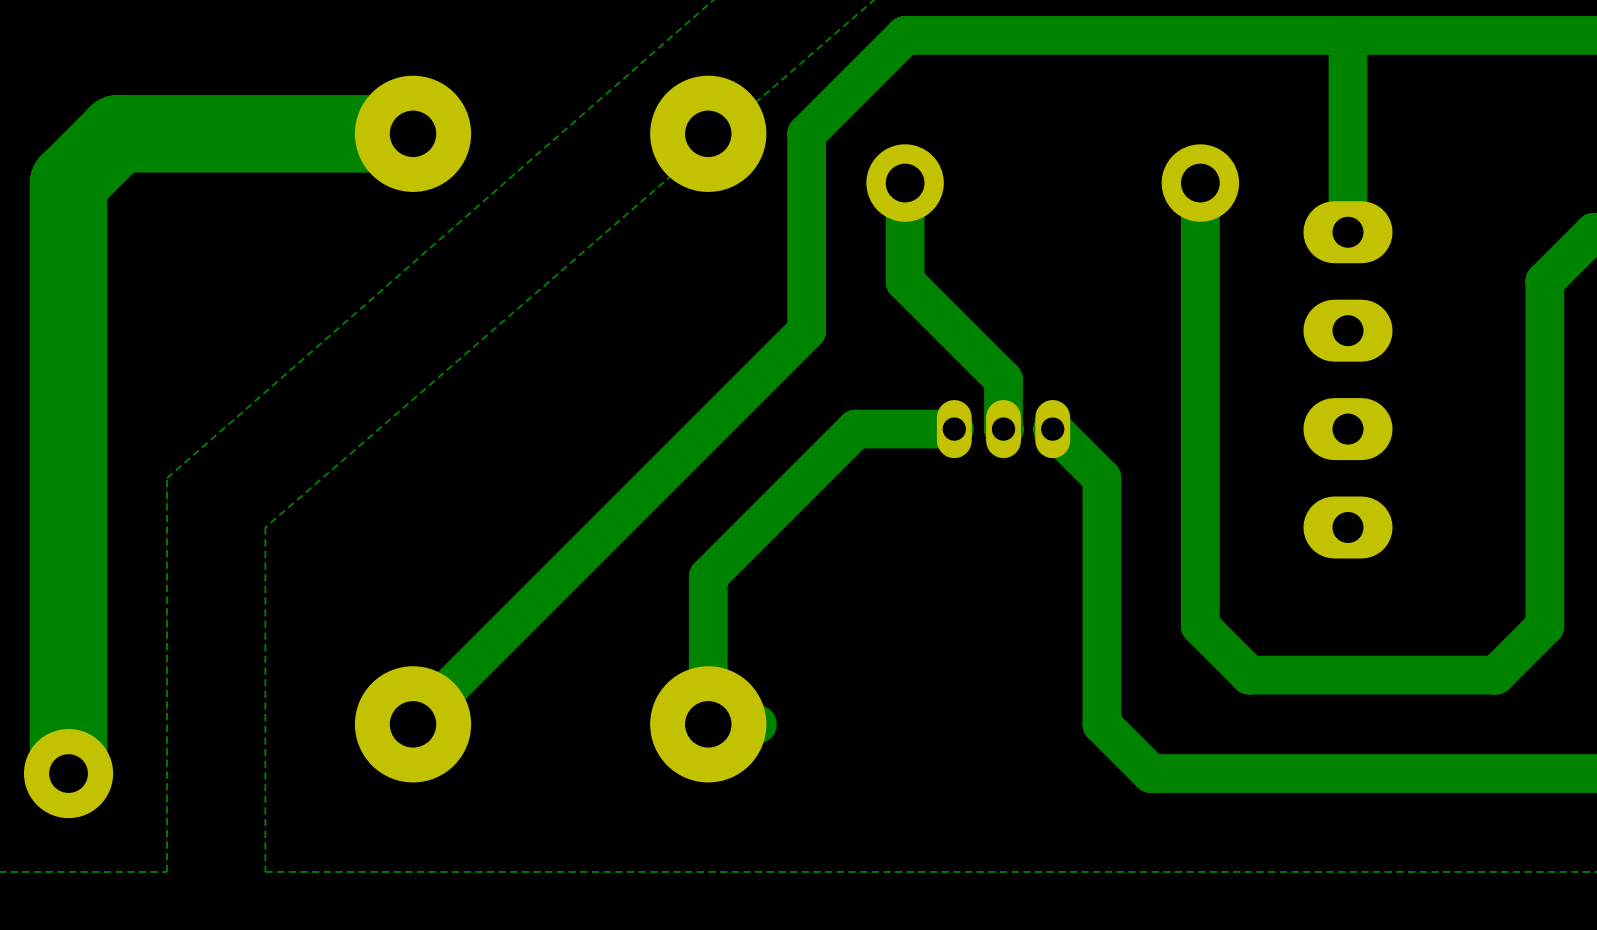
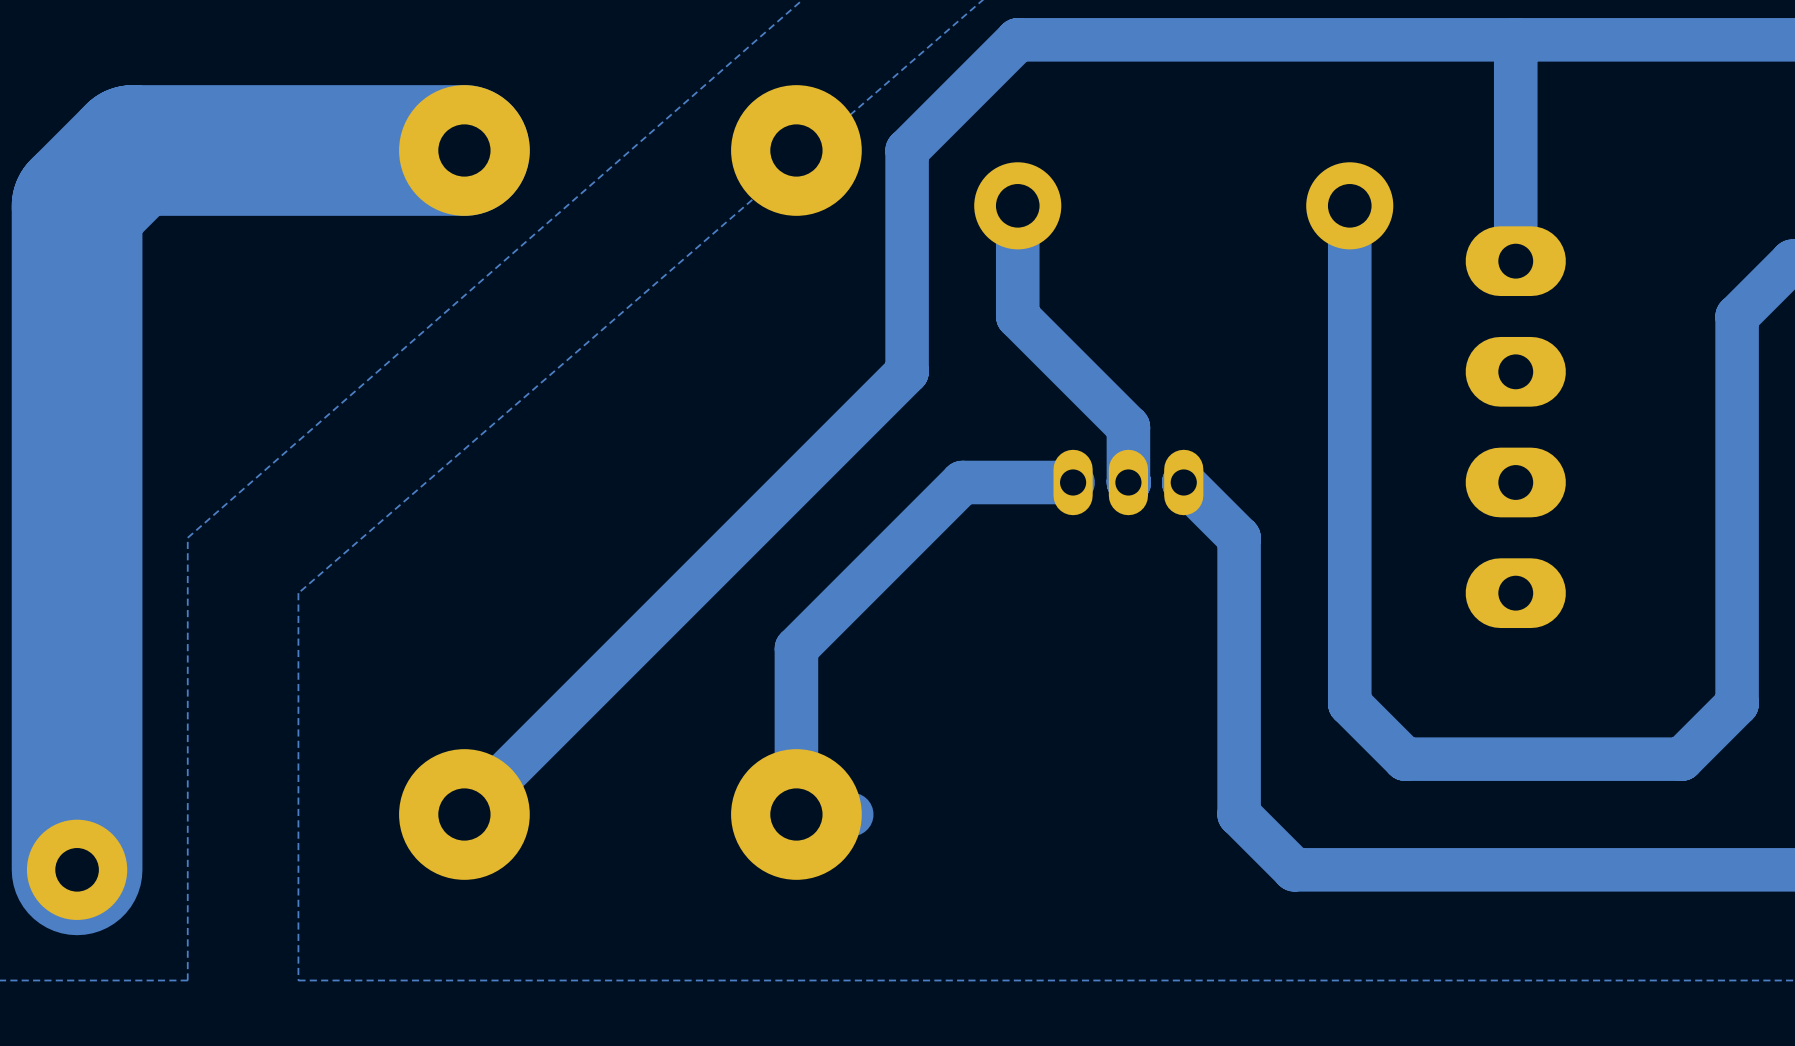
bottom track width: thin (413, 133) (117, 133) (68, 183) (68, 773) -> thick (464, 150) (132, 150) (77, 205) (77, 869)

